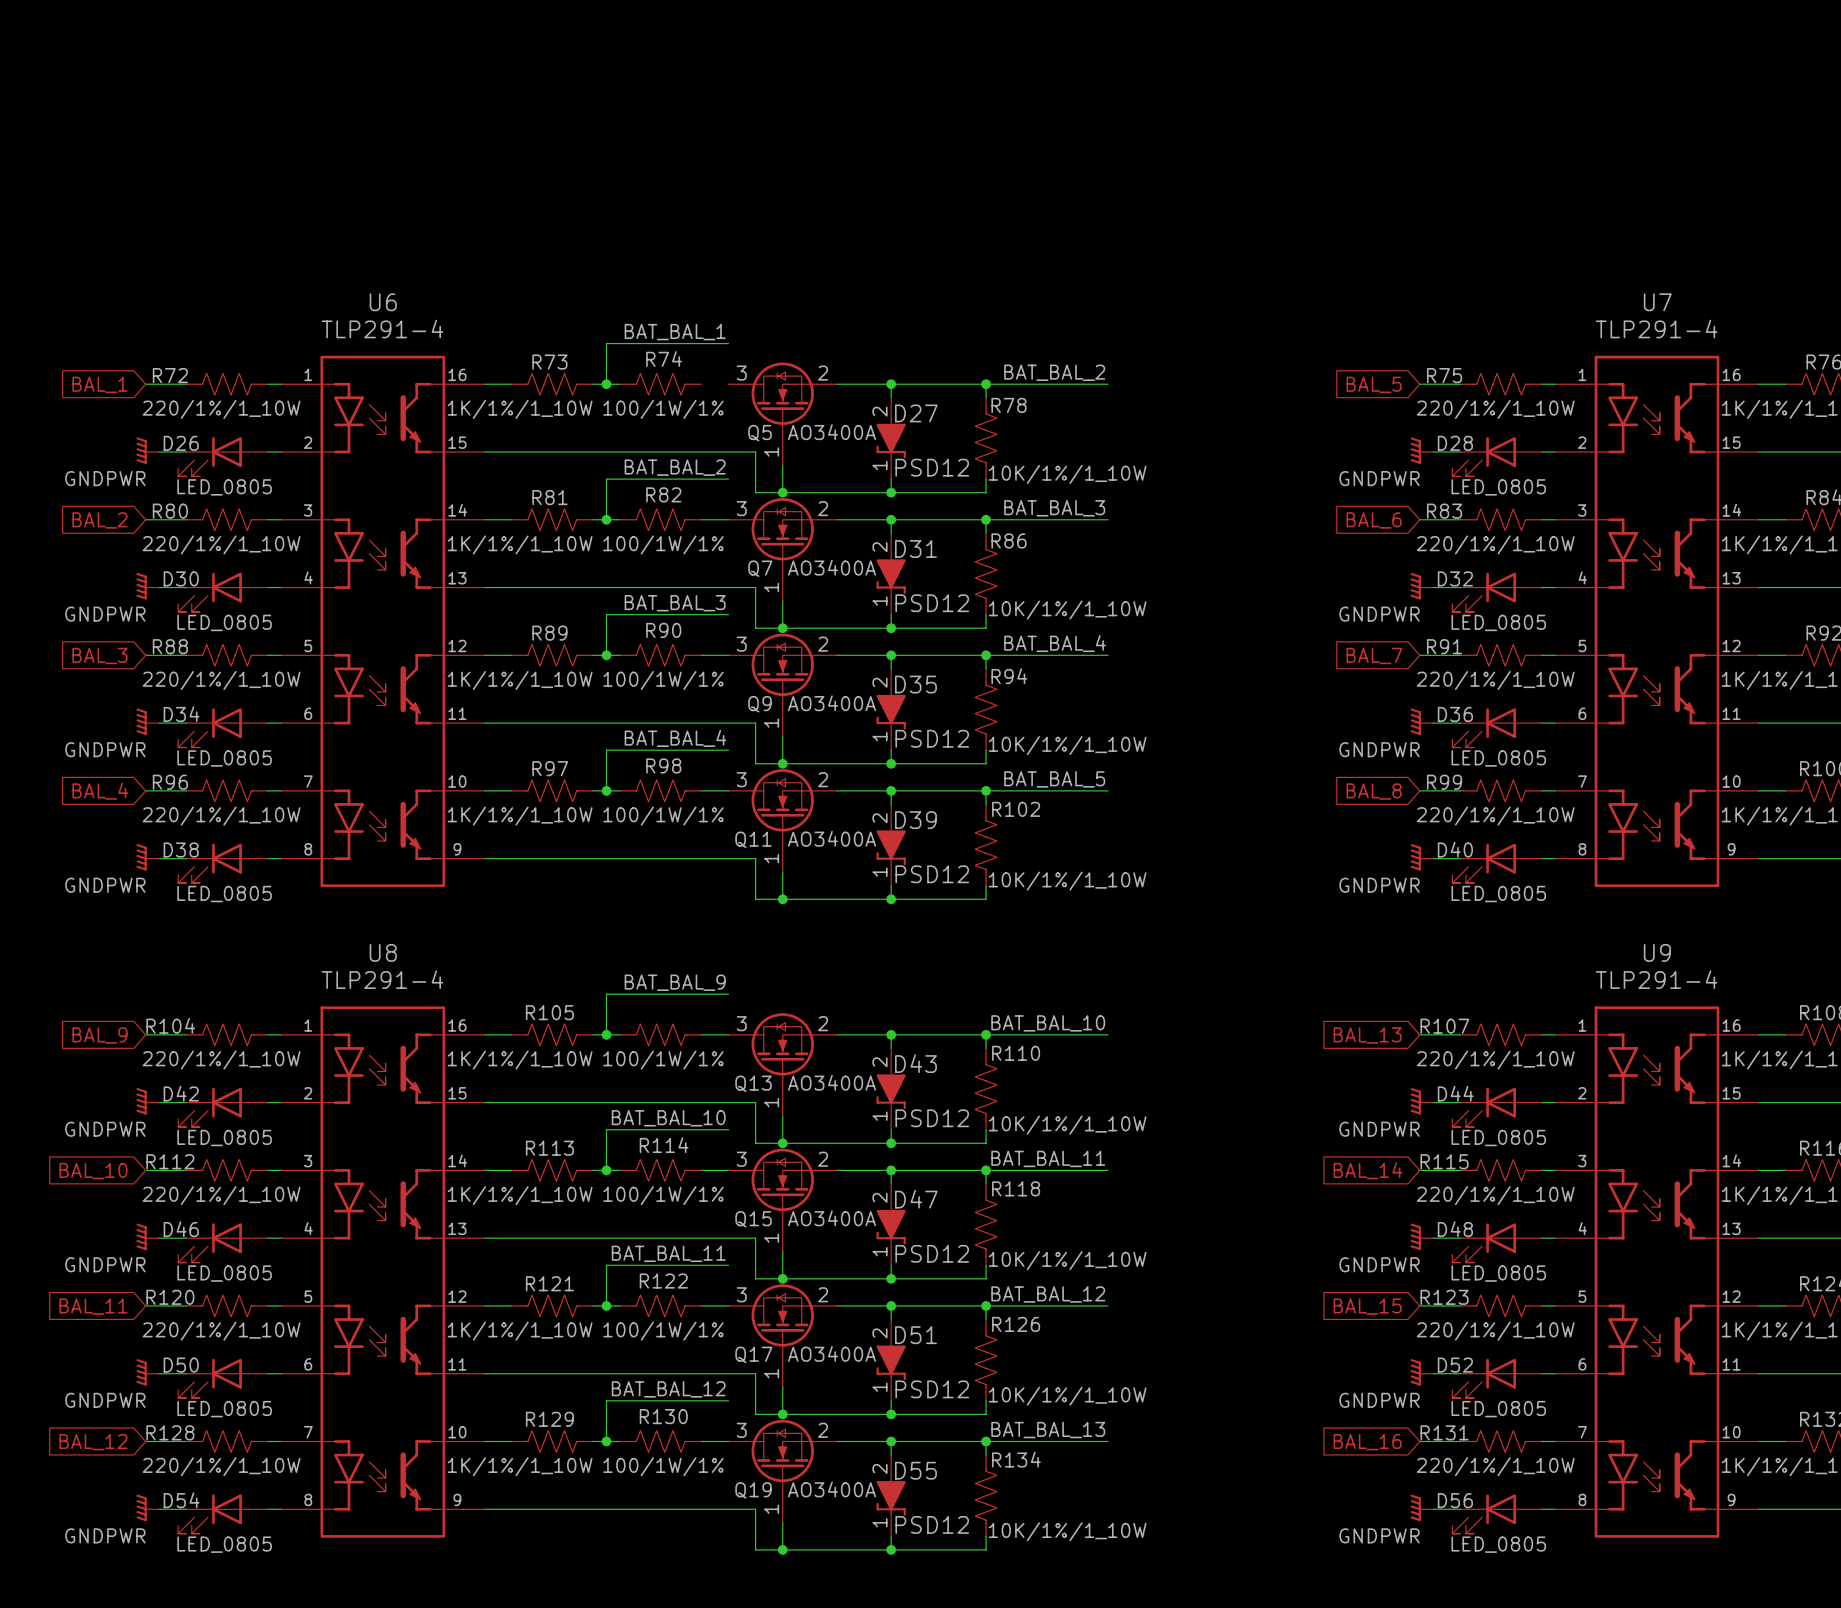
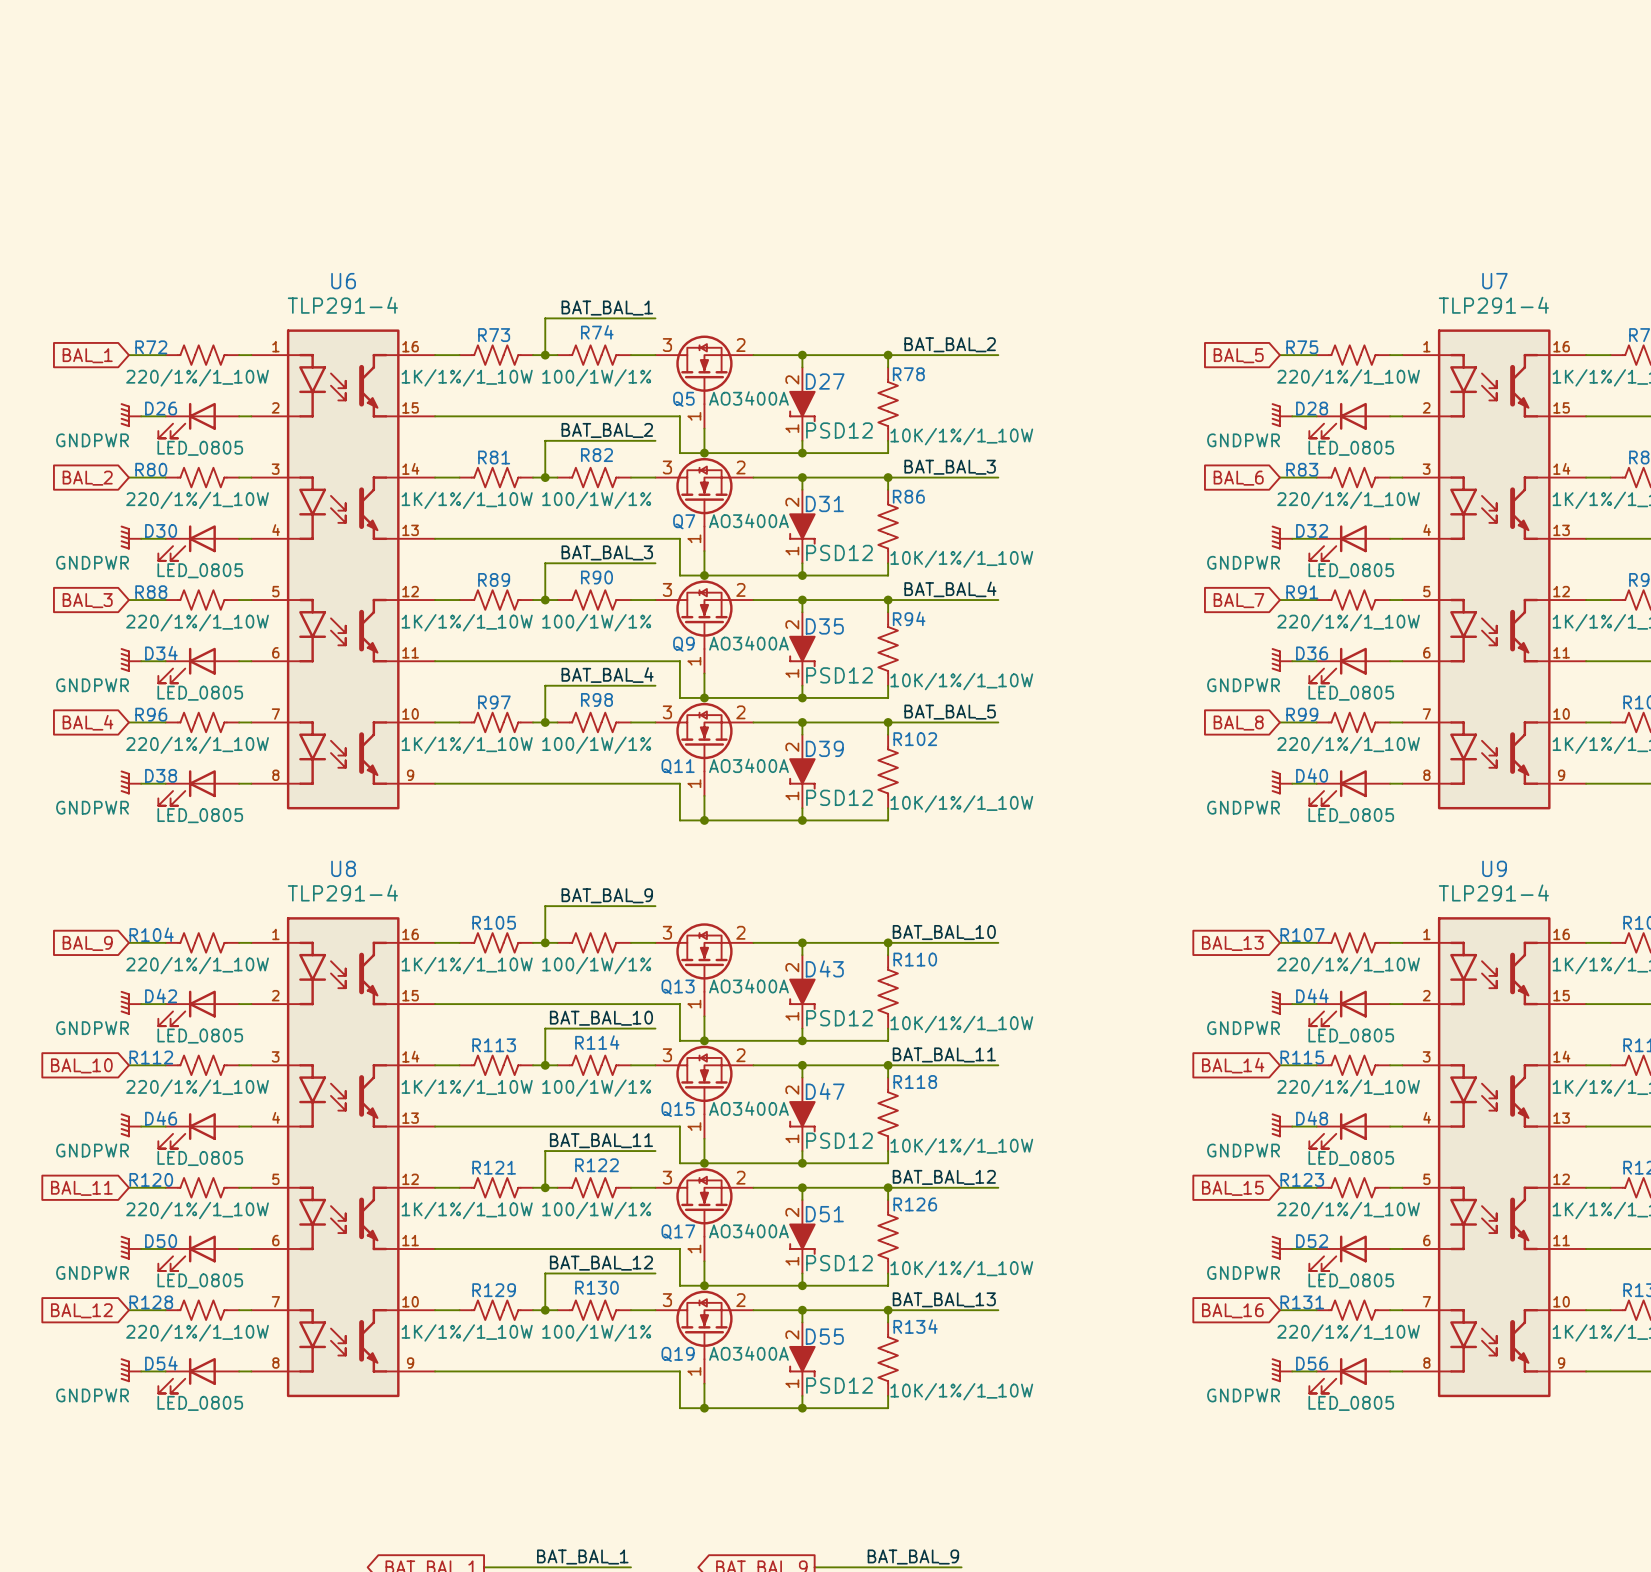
wire: none -> (630, 355) (655, 355)

